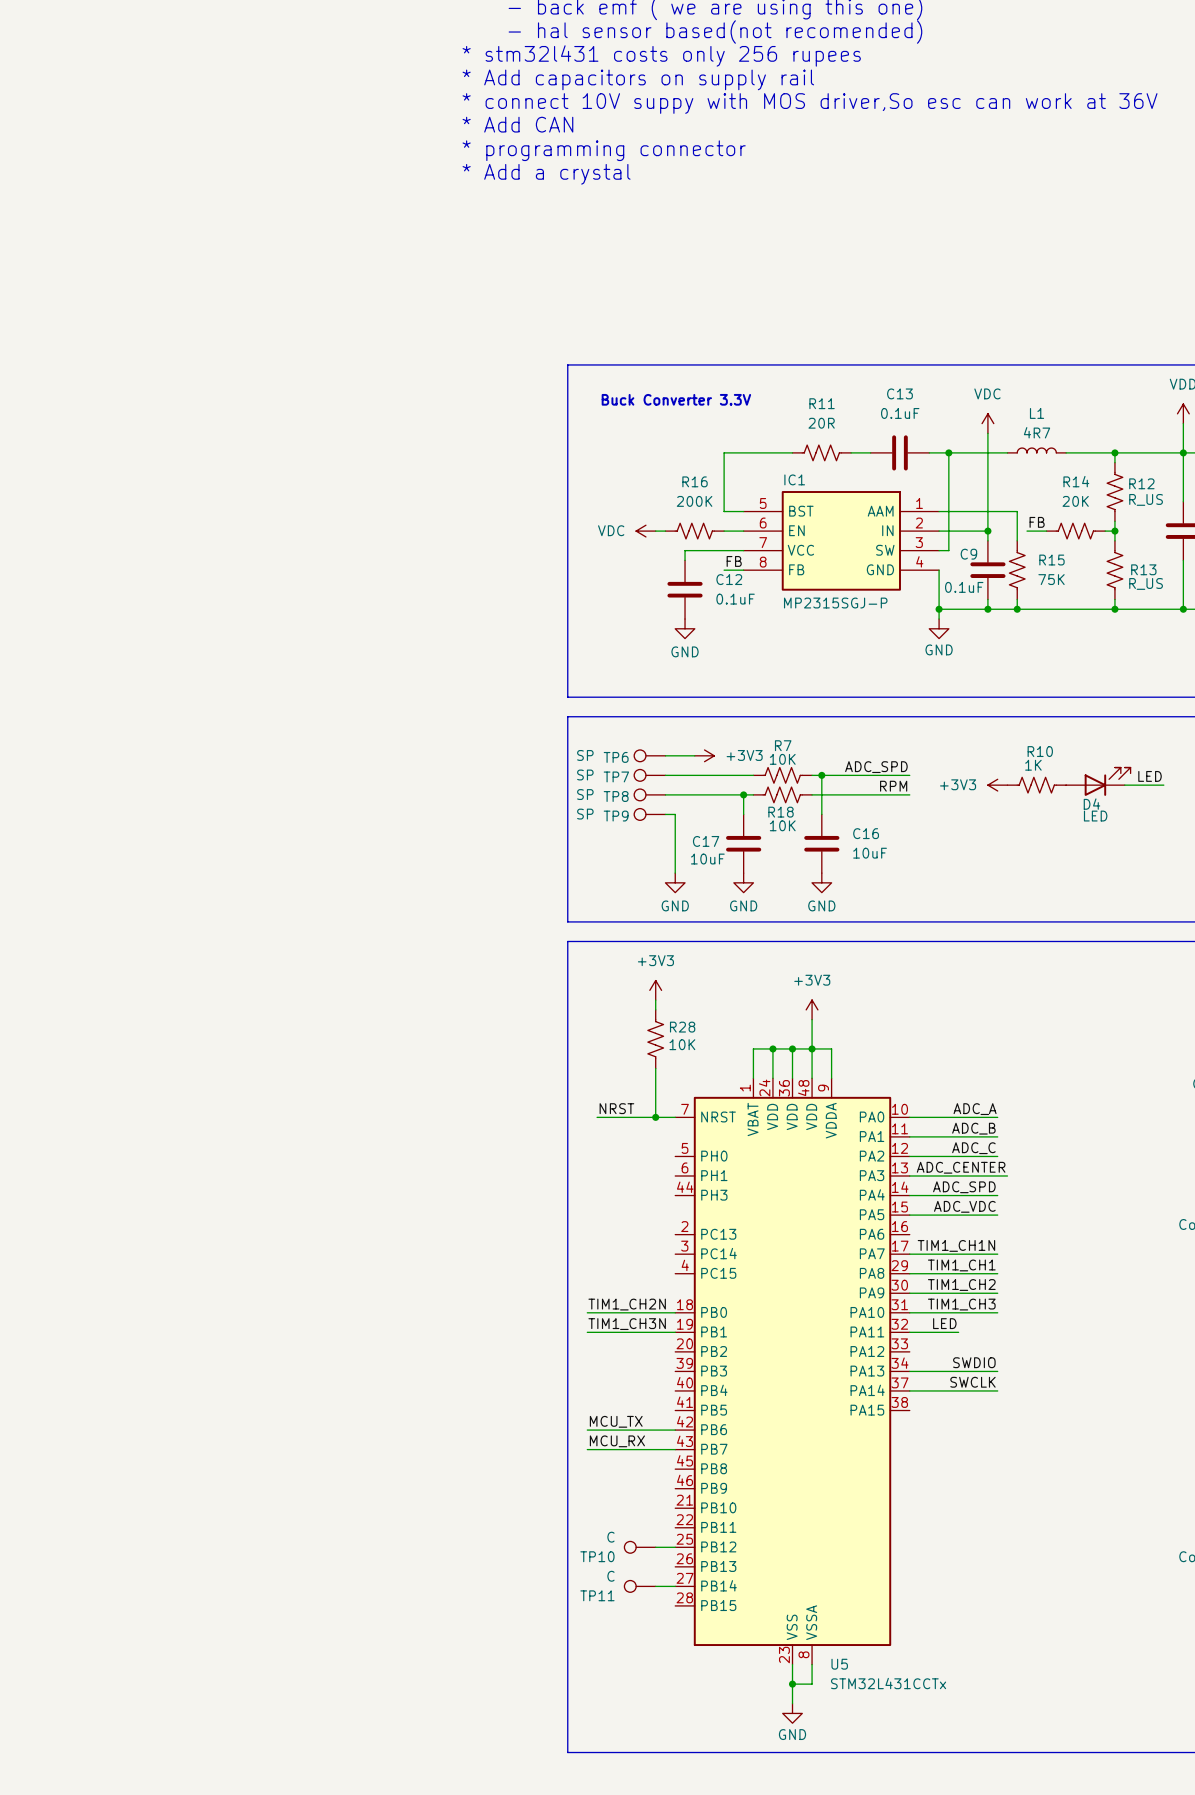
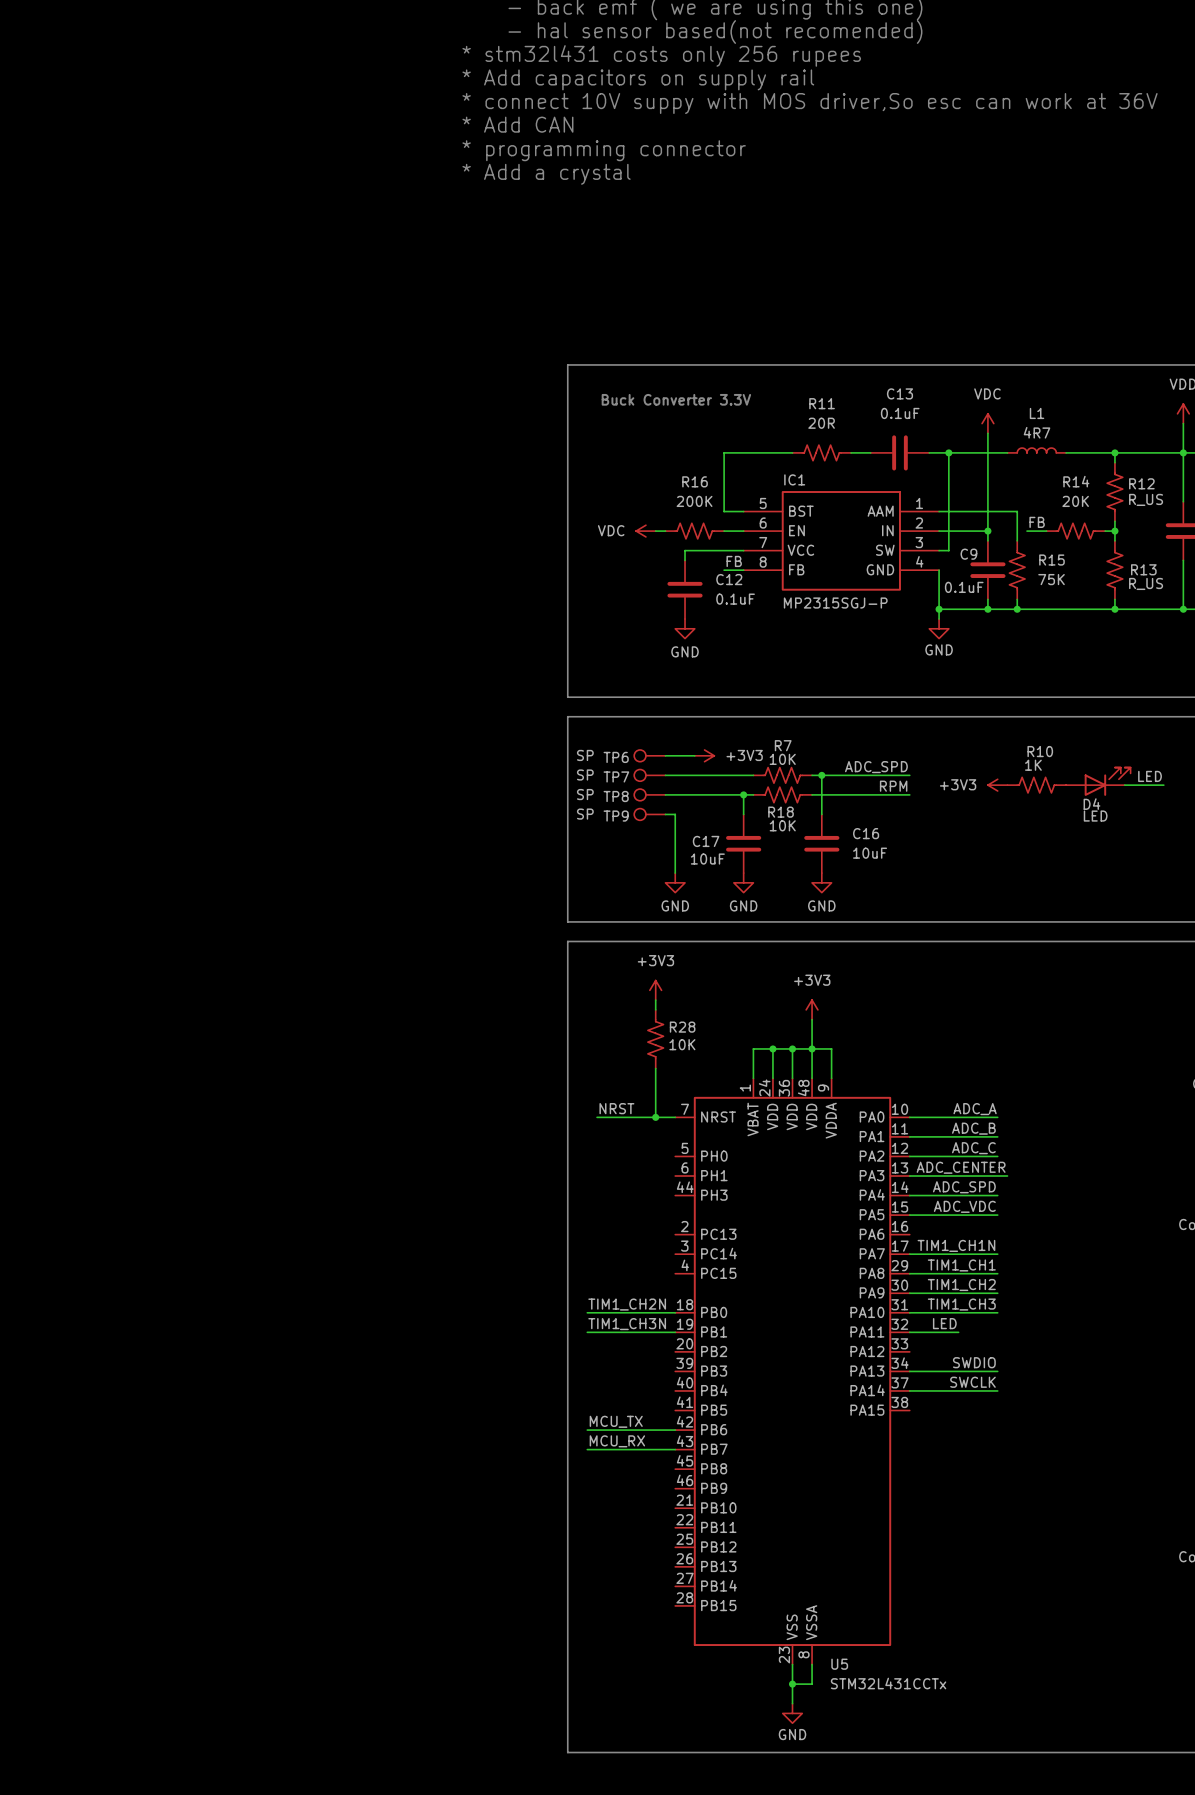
TP10: C (640, 1547) -> none
wire: (655, 1547) (675, 1547) -> none
TP11: C (640, 1586) -> none
wire: (655, 1586) (675, 1586) -> none

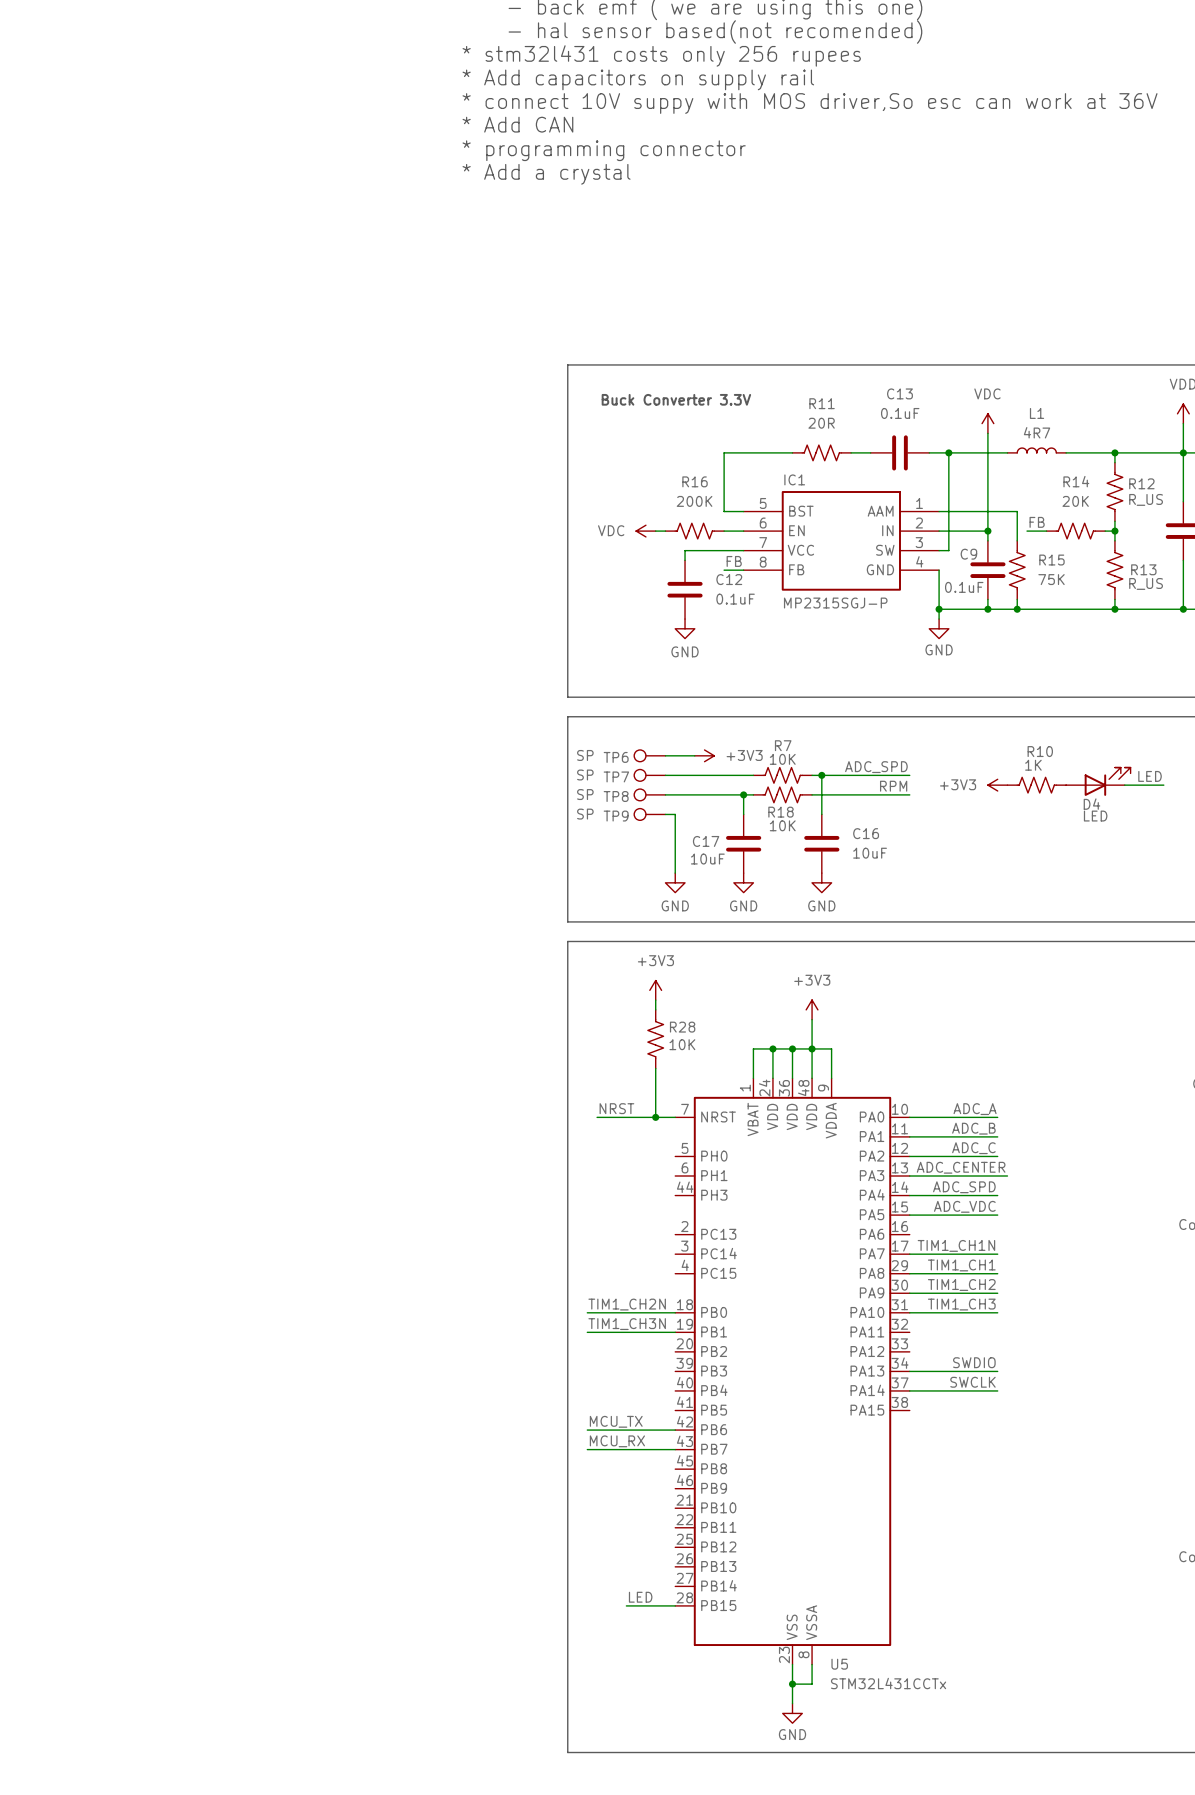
label: LED (944, 1323) -> none
wire: (909, 1332) (958, 1332) -> none
label: none -> LED (640, 1597)
wire: none -> (626, 1605) (675, 1605)

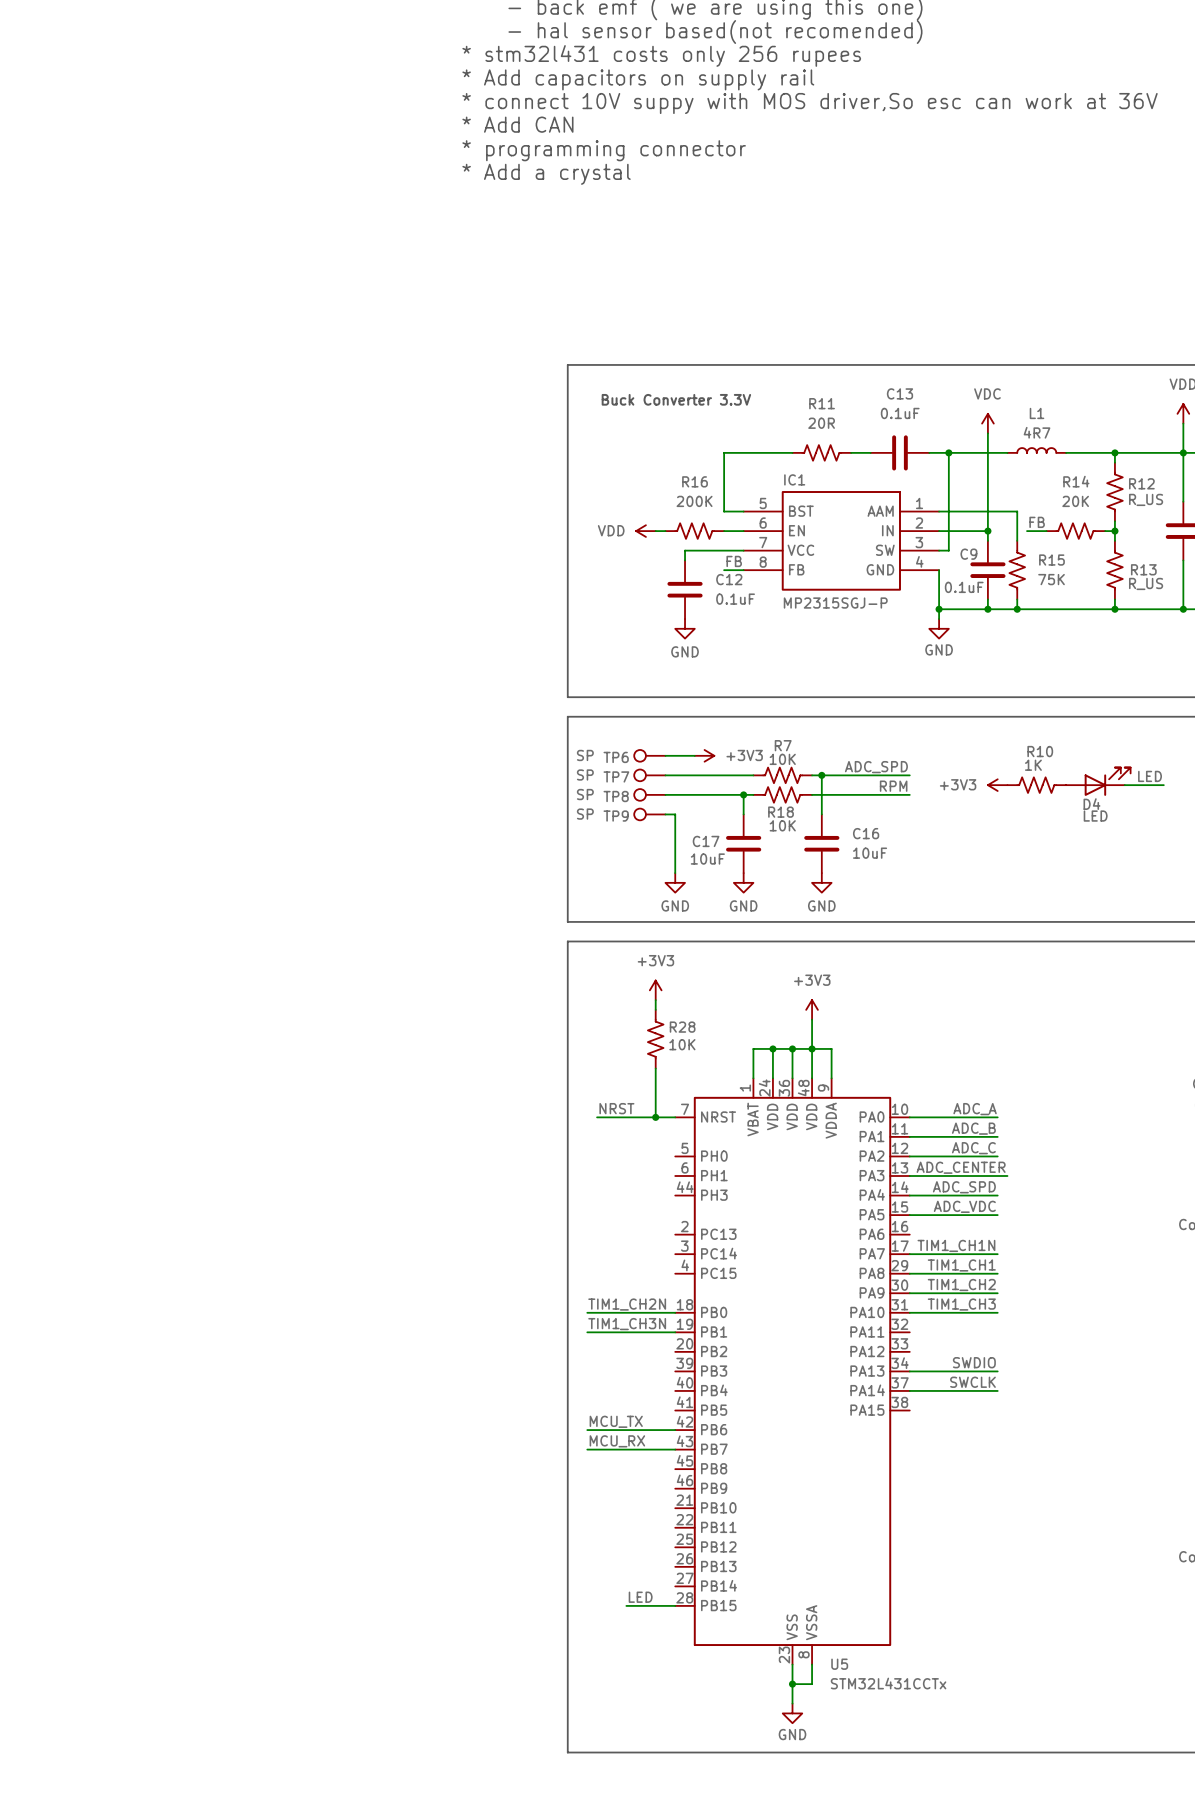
power symbol: VDC (645, 531) -> VDD (645, 531)

